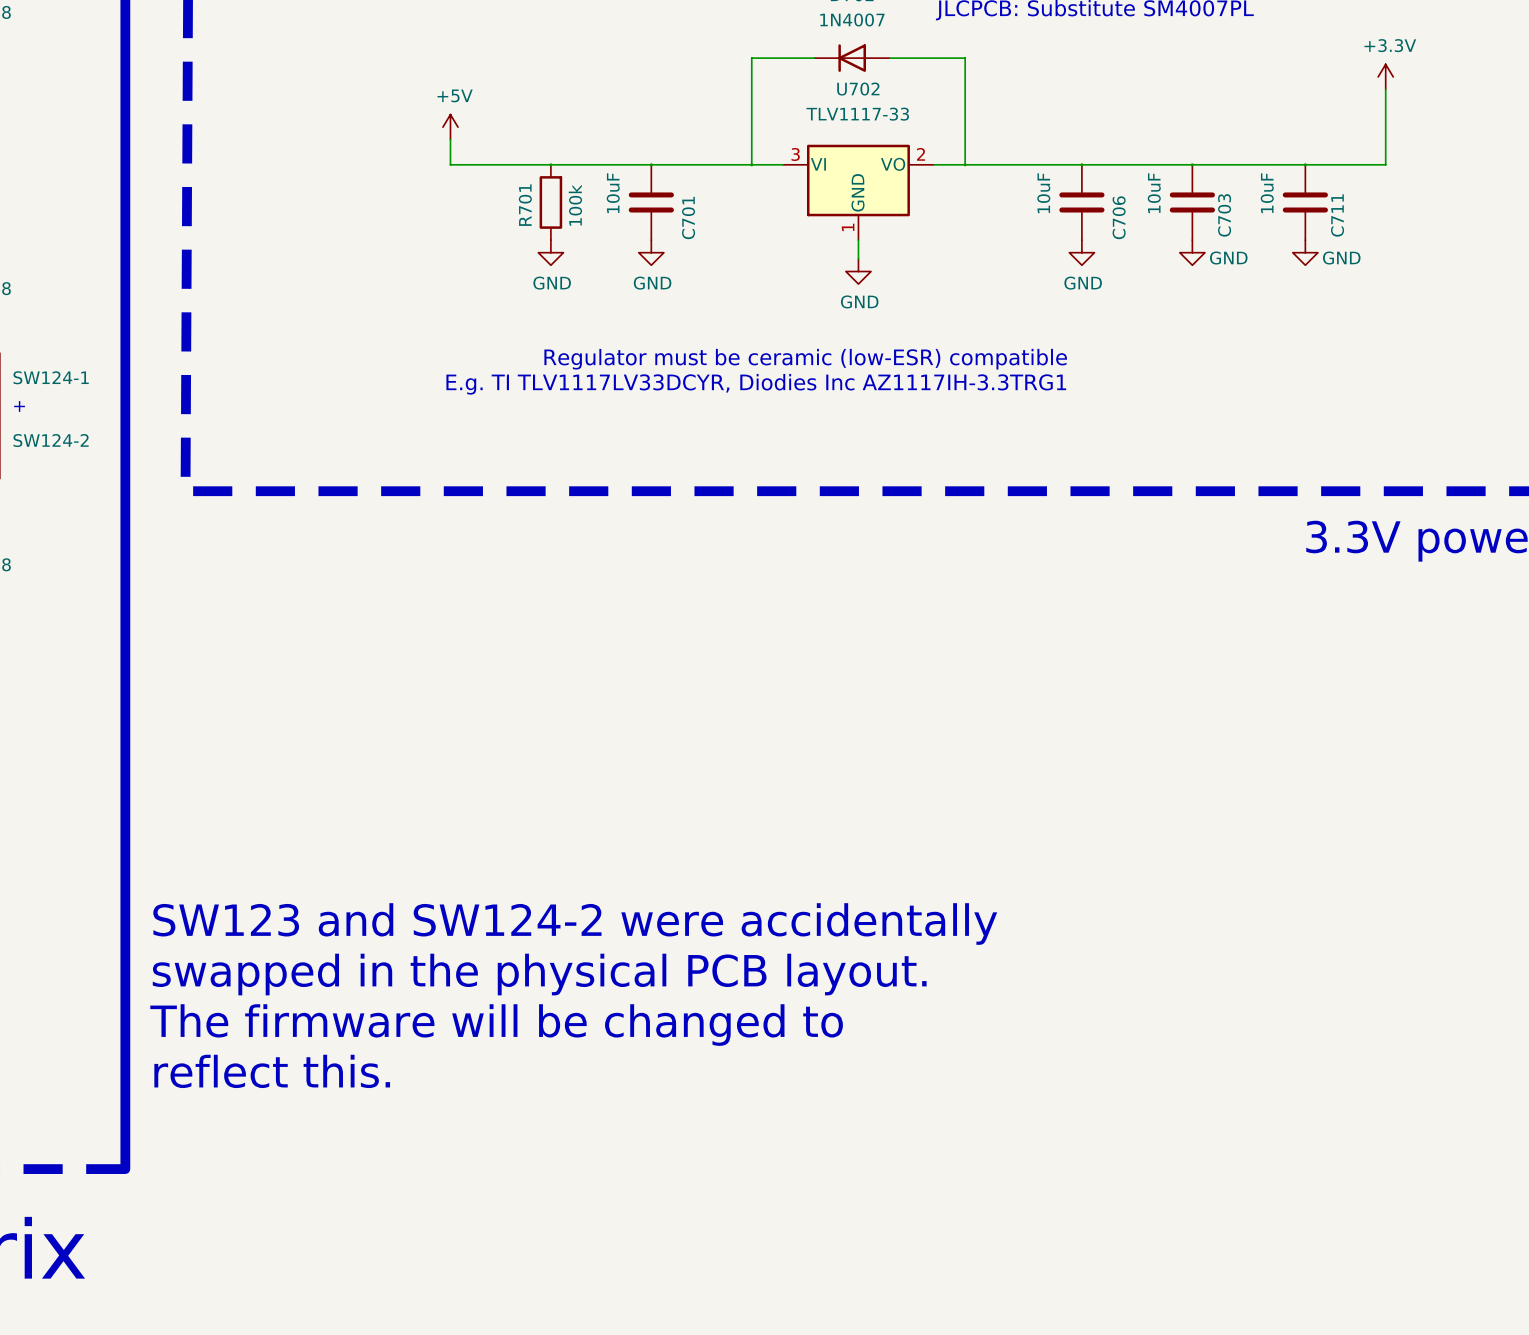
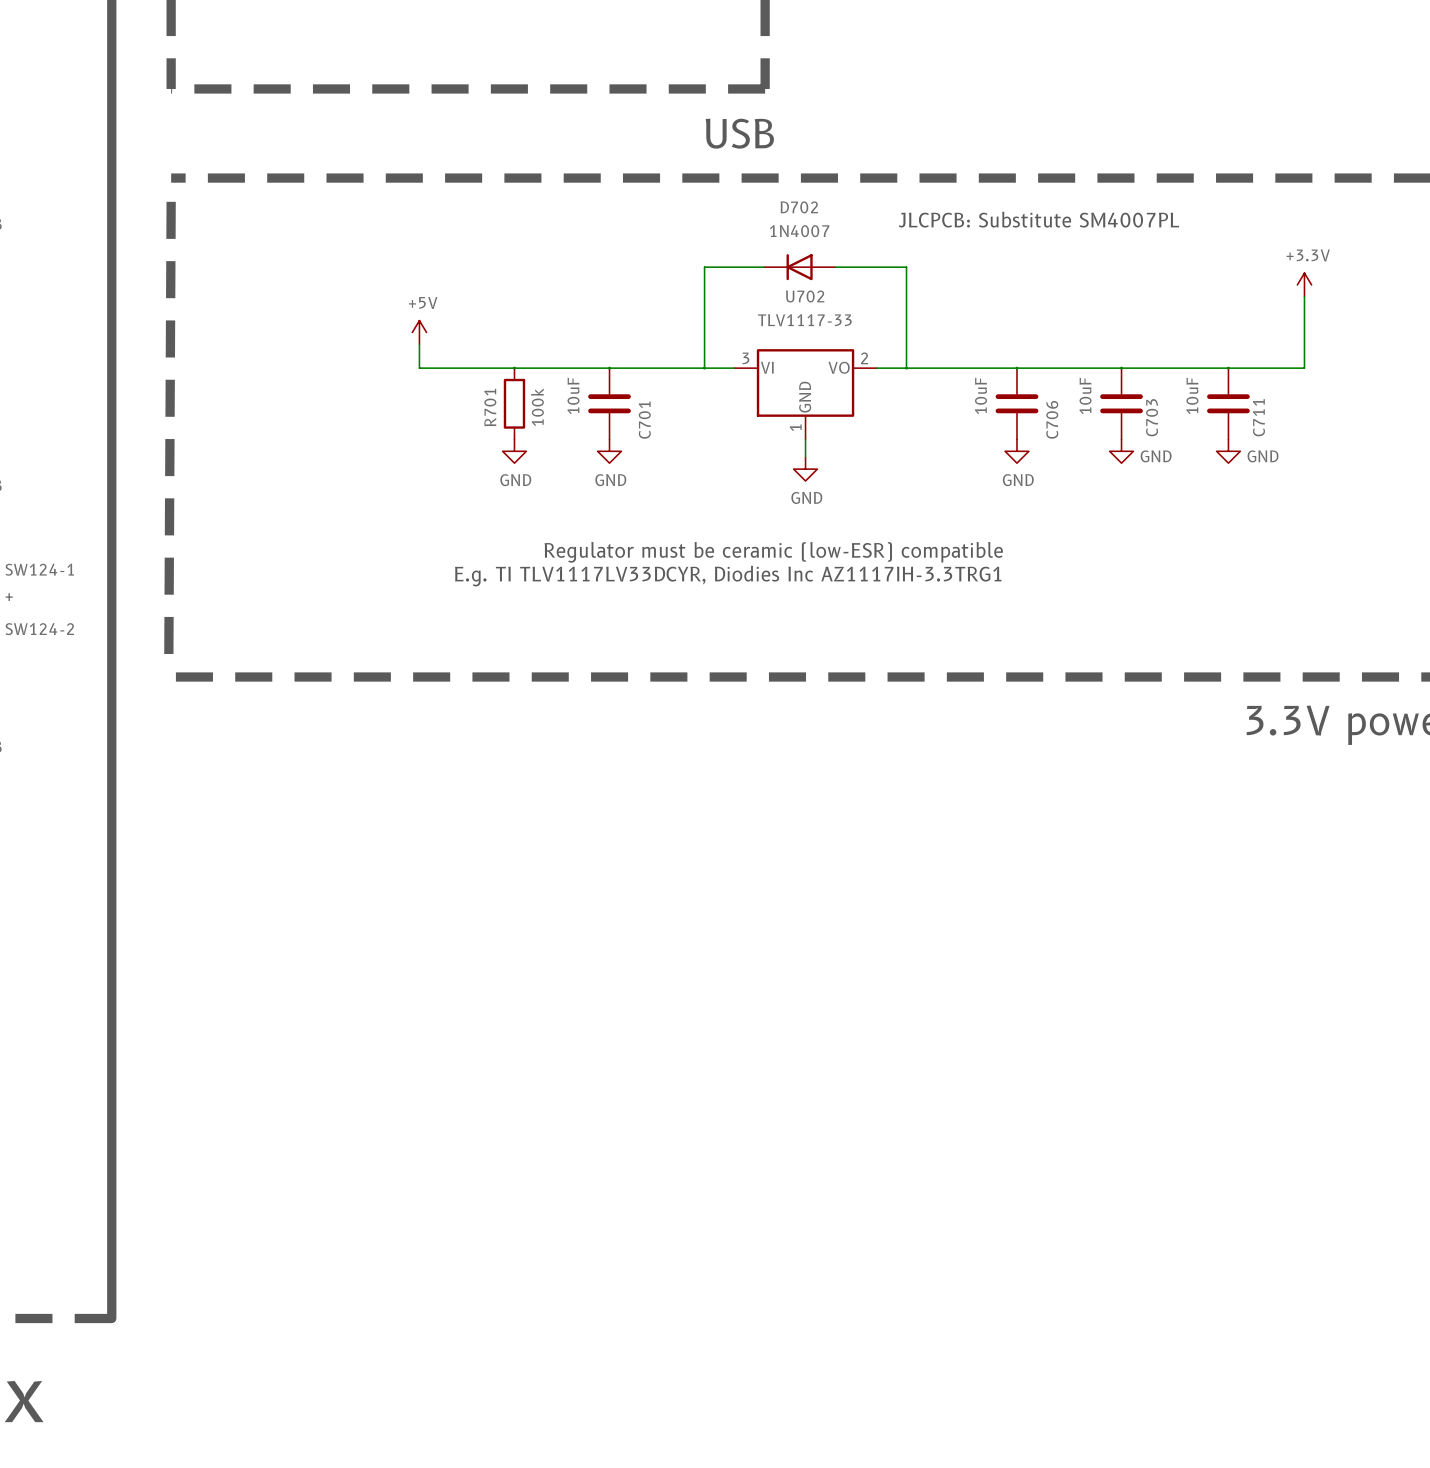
text: SW123 and SW124-2 were accidentally (575, 923) -> none
text: swapped in the physical PCB layout. (539, 974) -> none
text: The firmware will be changed to (496, 1025) -> none
text: reflect this. (272, 1071) -> none

